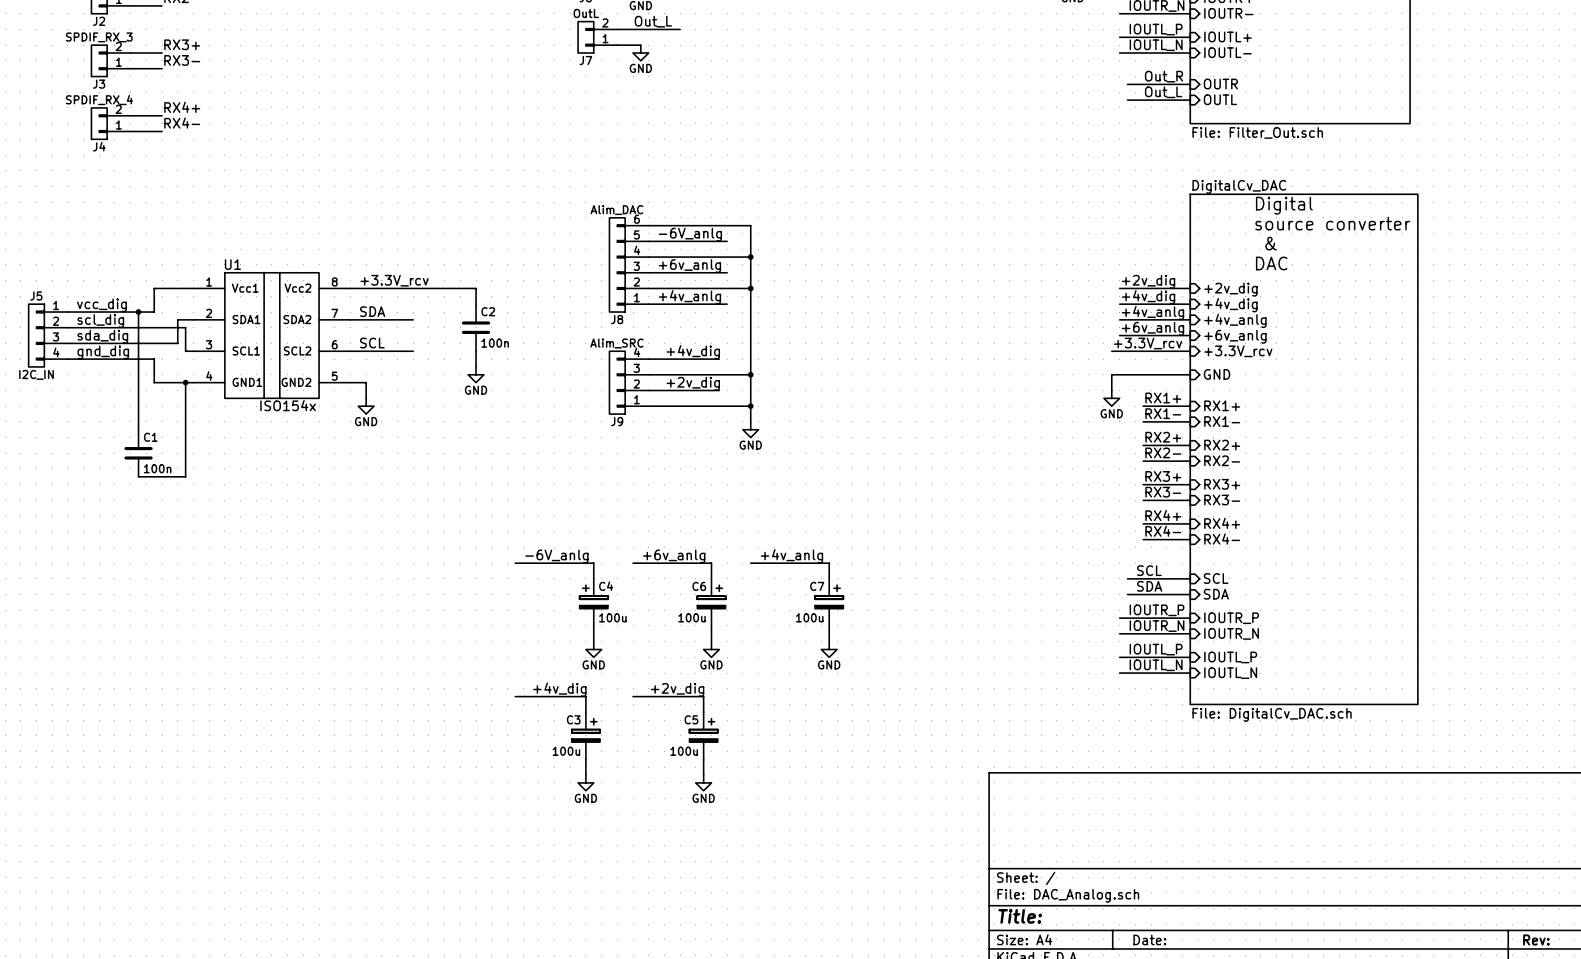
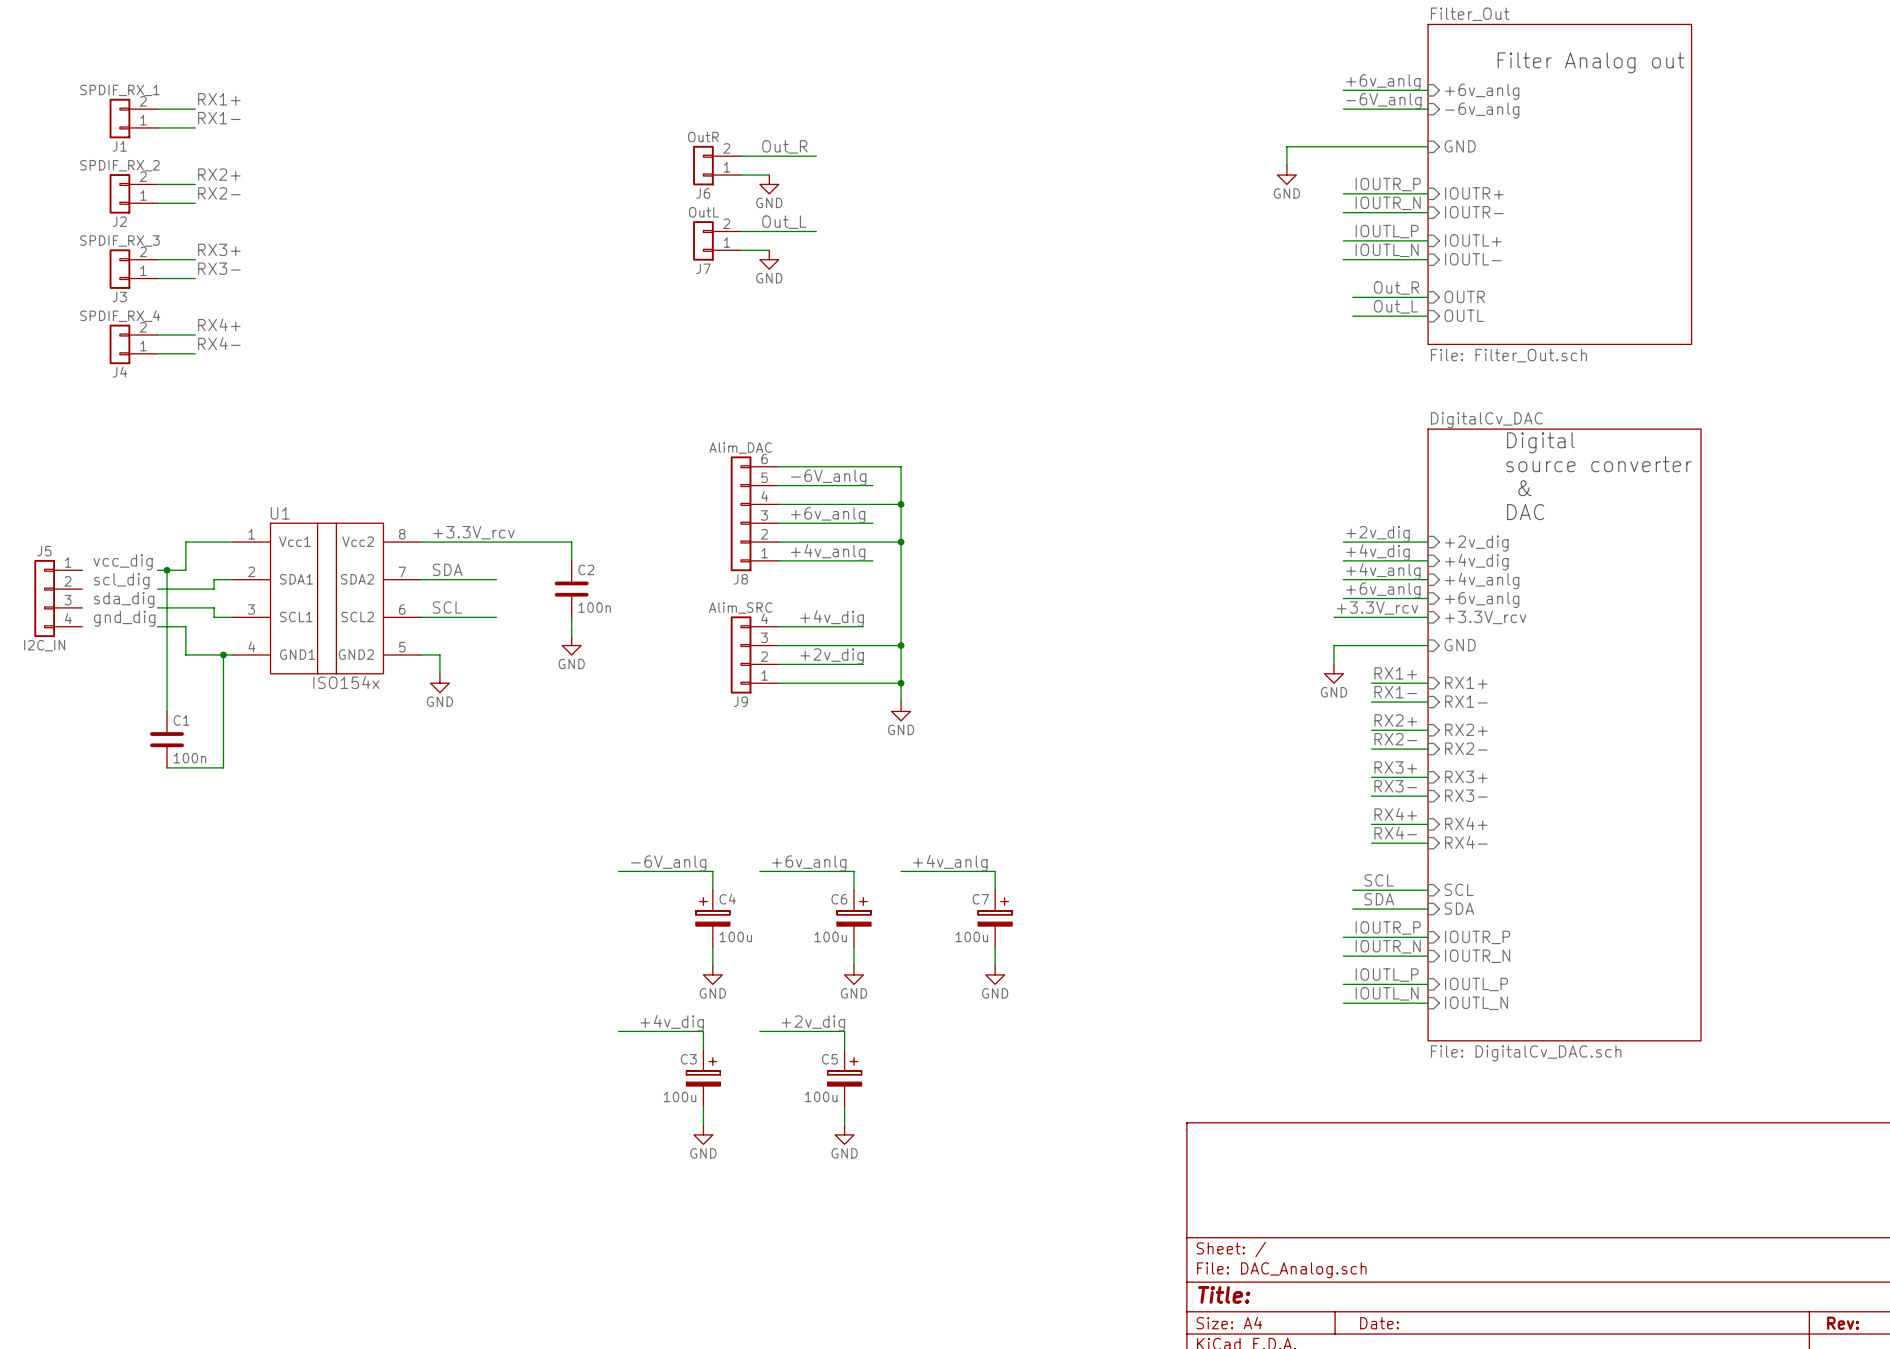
wire: (67, 312) (130, 312) -> none
wire: (67, 327) (130, 327) -> none
wire: (67, 343) (130, 343) -> none
wire: (177, 343) (177, 327) (185, 327) (185, 351) -> (214, 607) (214, 617) (223, 617)
wire: (67, 359) (130, 359) -> none

